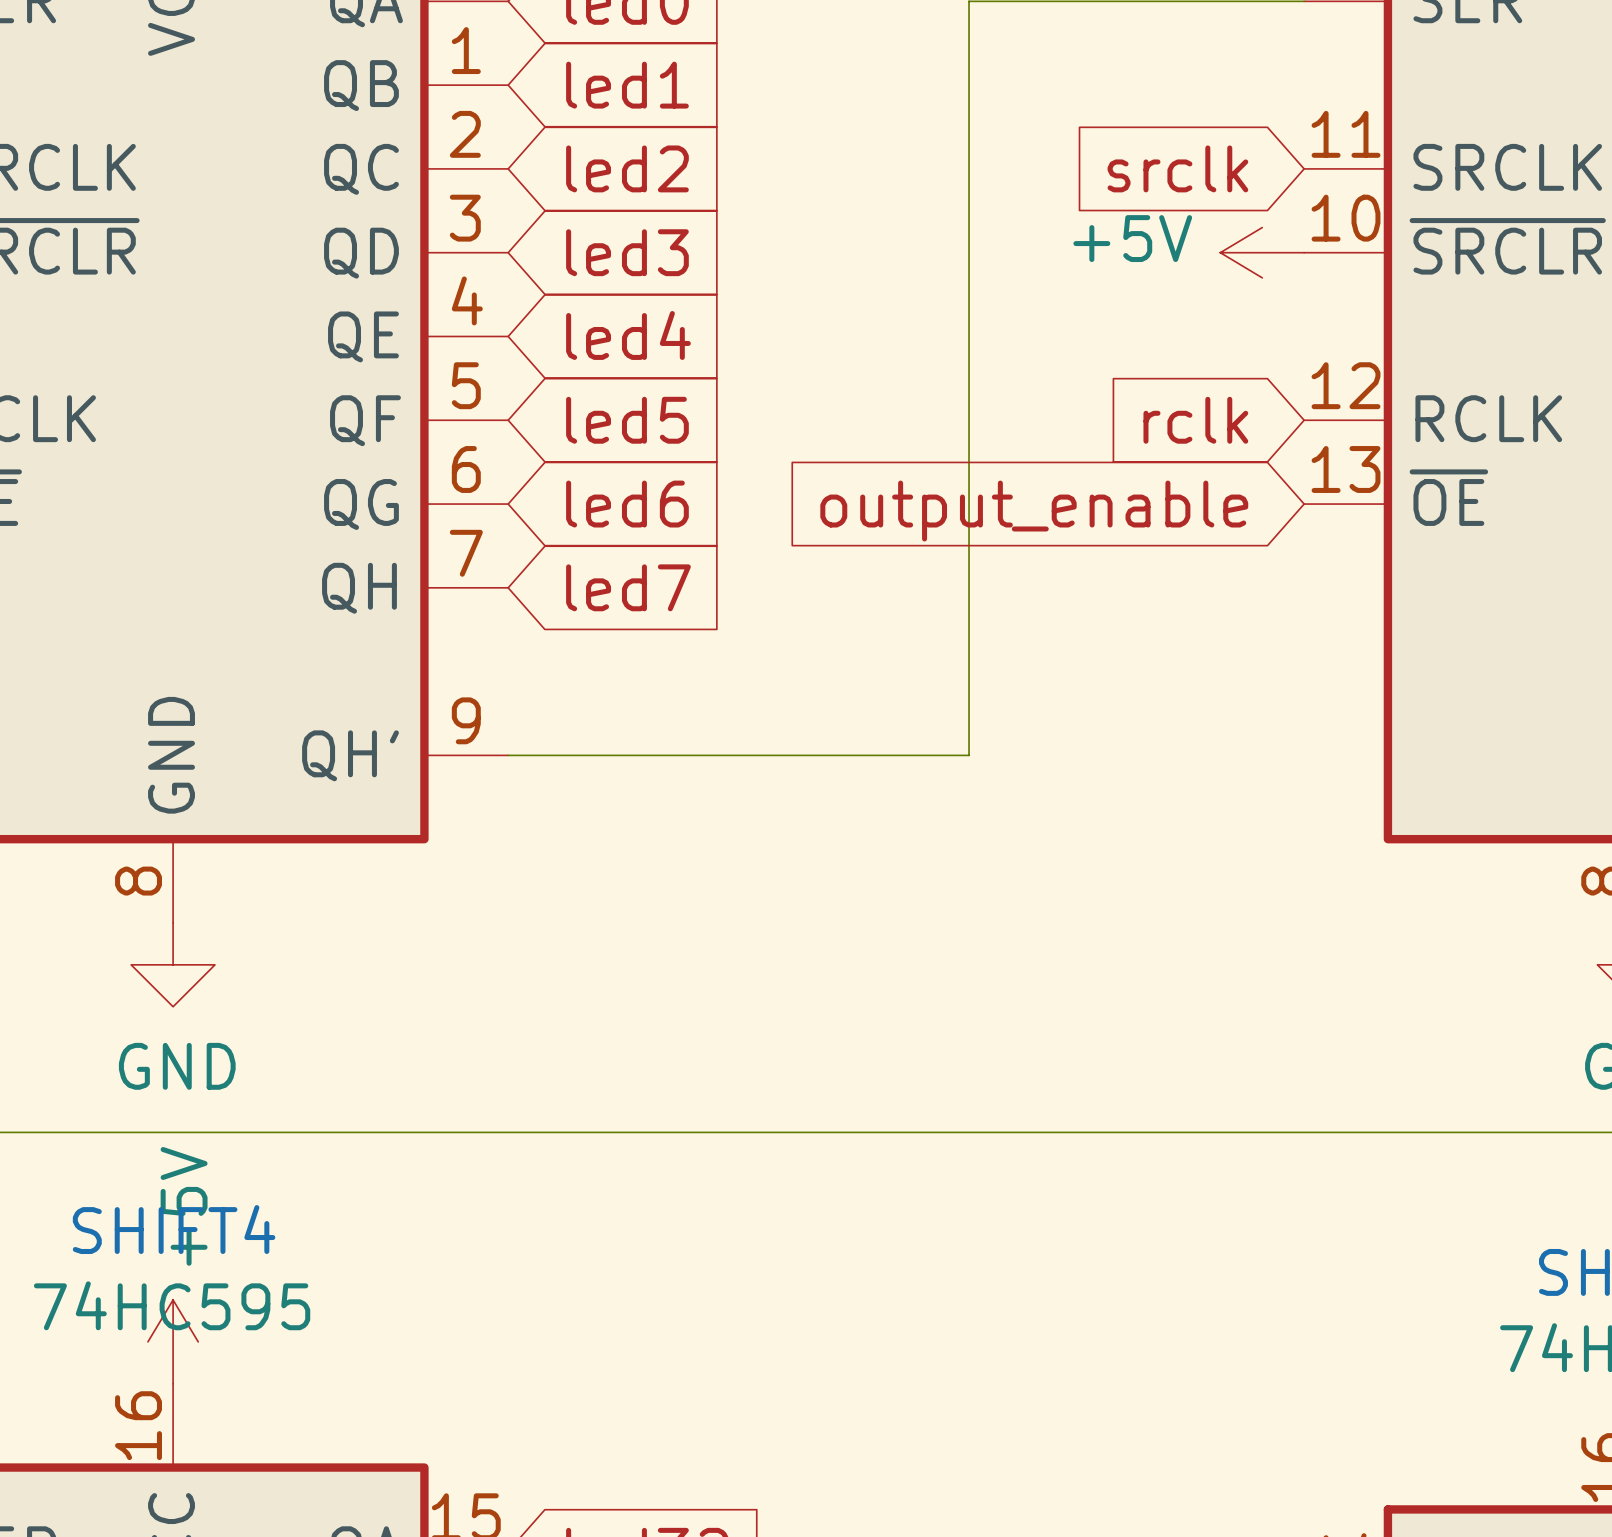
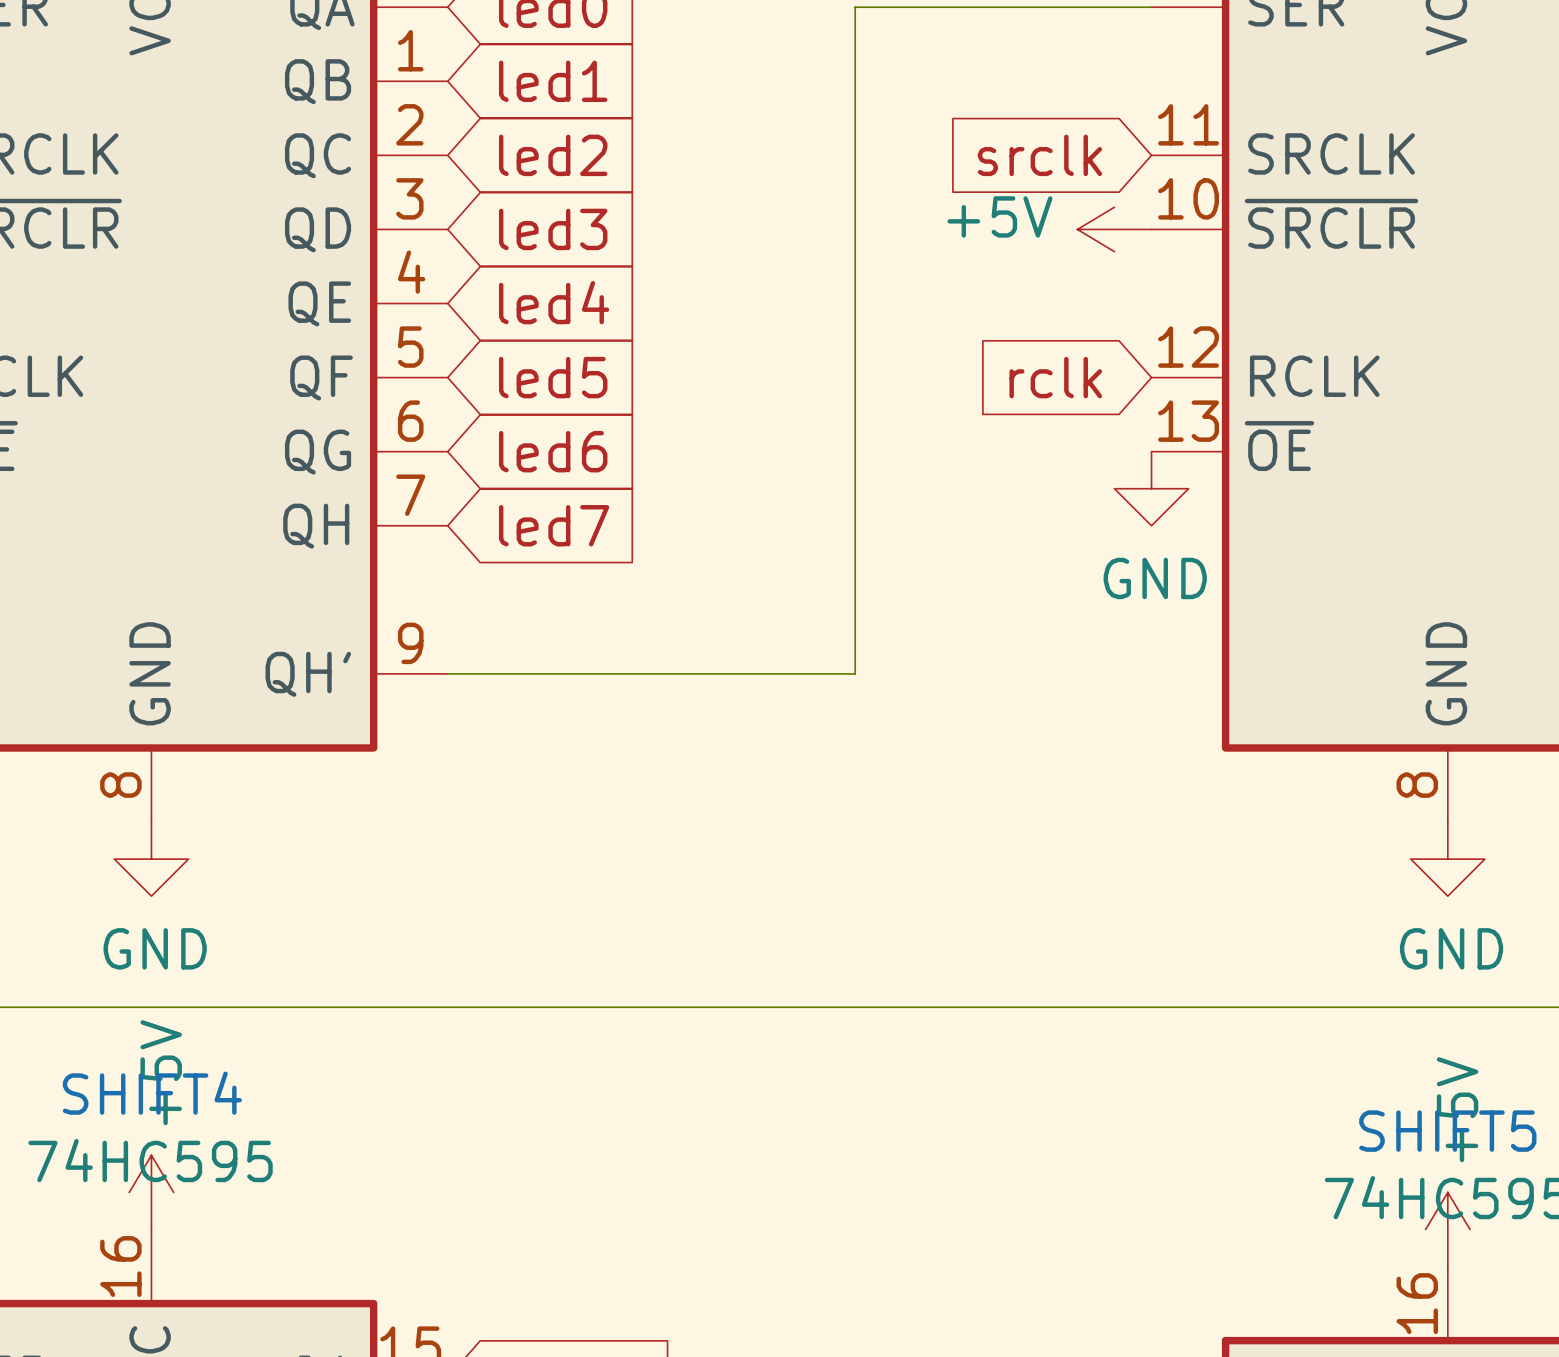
global label: output_enable (1034, 511) -> none
power symbol: none -> GND (1151, 488)

